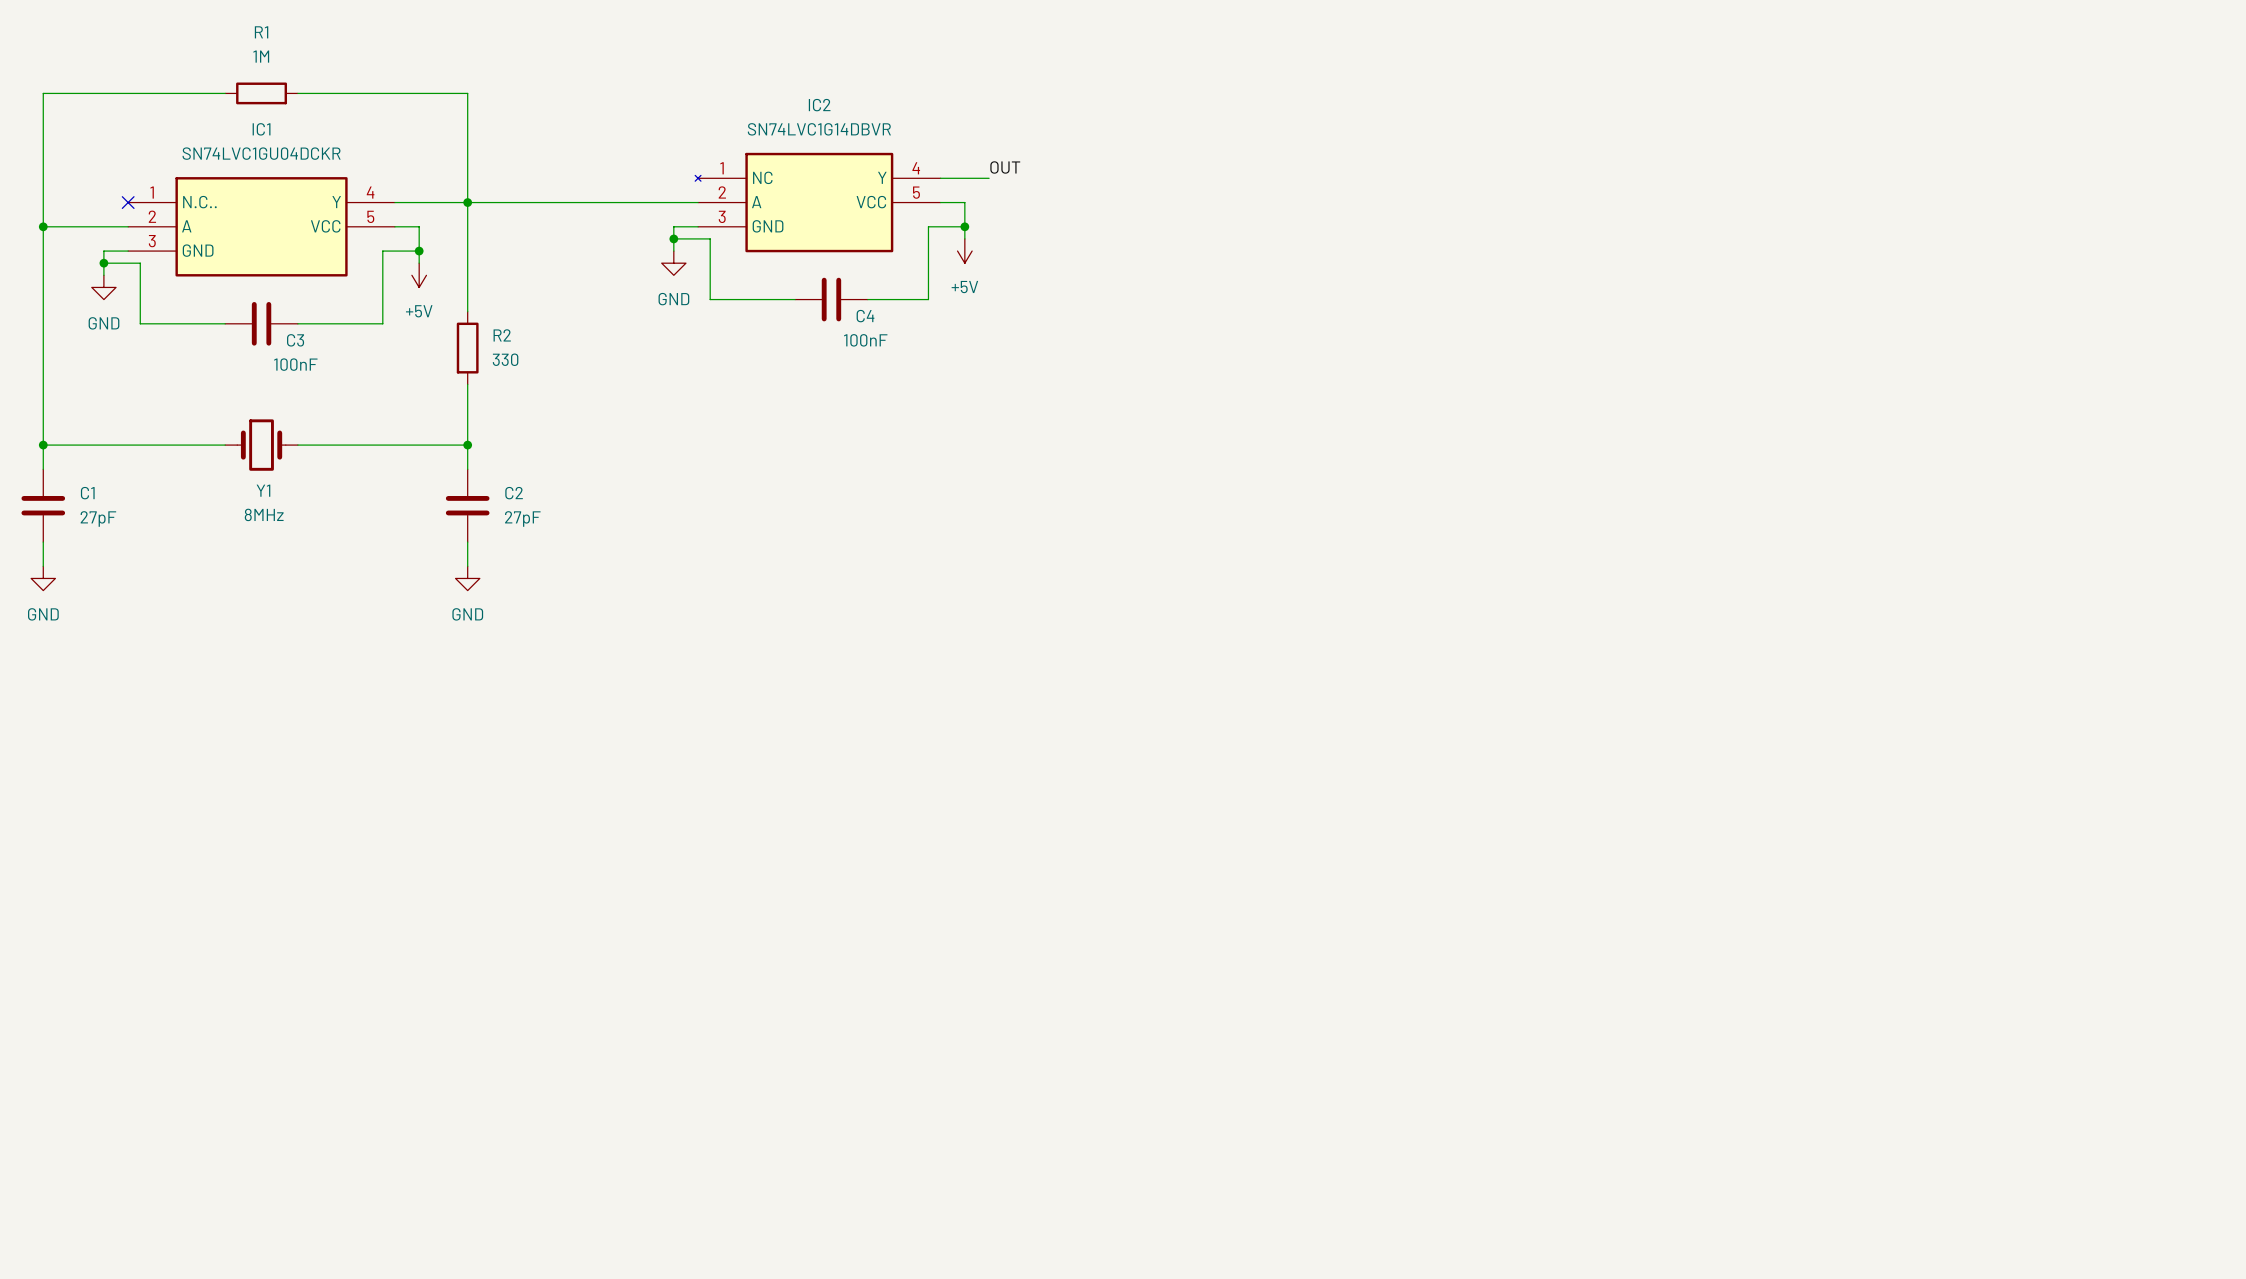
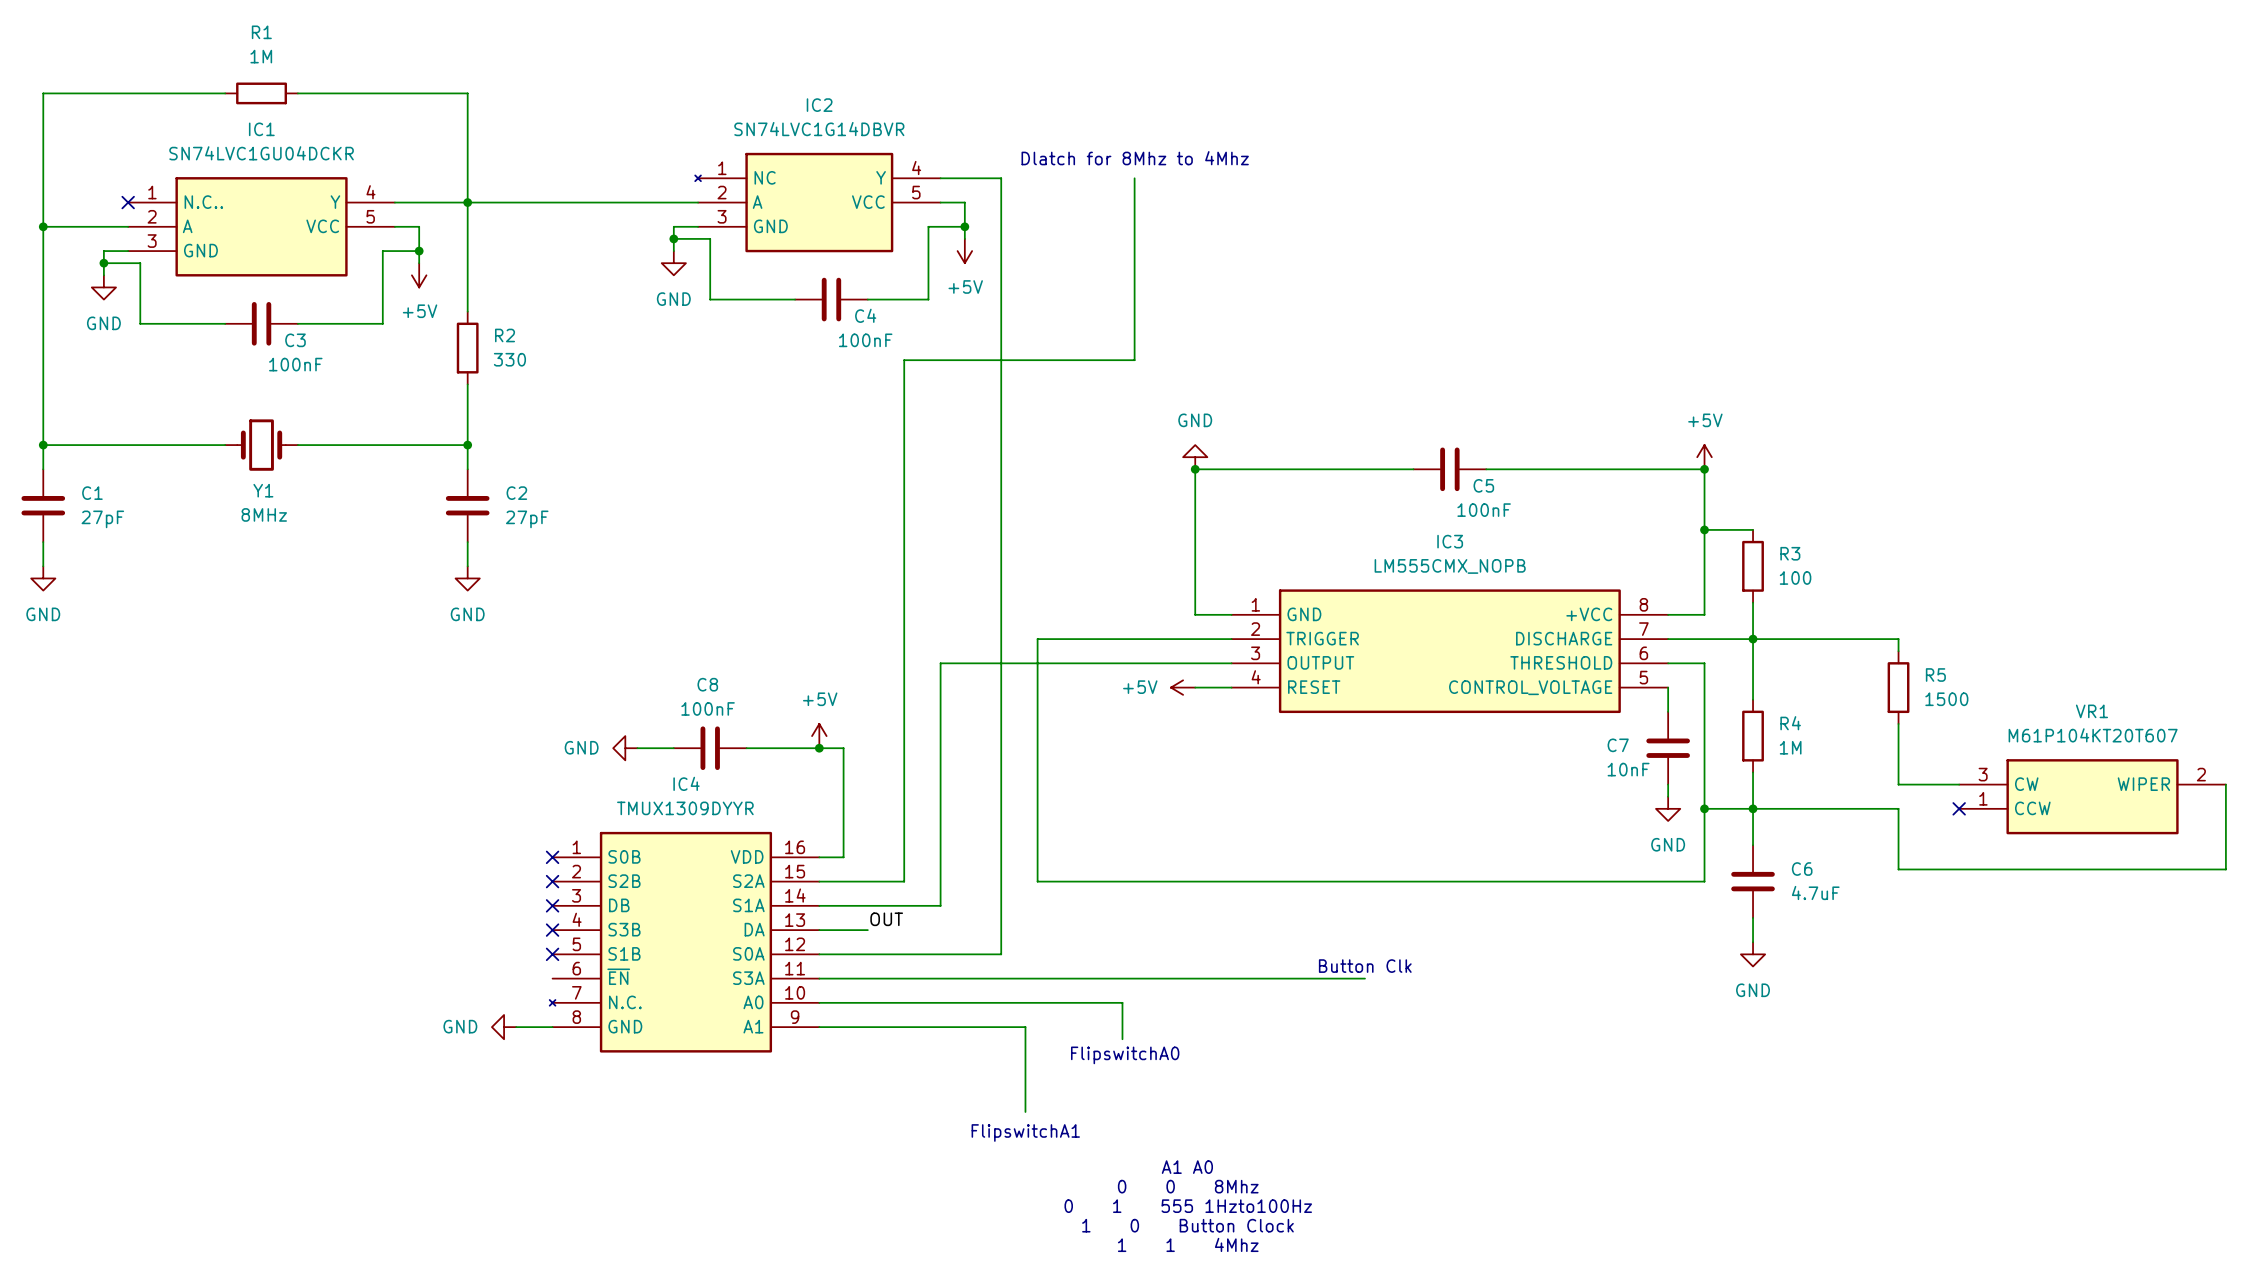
text: none -> Dlatch for 8Mhz to 4Mhz (1135, 158)
label: OUT (1005, 167) -> none
wire: none -> (989, 178) (1001, 178) (1001, 954) (819, 954)
wire: none -> (1134, 178) (1134, 360) (904, 360) (904, 881) (819, 881)
power symbol: none -> GND (1195, 457)
power symbol: none -> +5V (1704, 457)
junction: none -> (1195, 469)
wire: none -> (1413, 469) (1195, 469) (1195, 614) (1231, 614)
C5: none -> 100nF (1449, 469)
wire: none -> (1486, 469) (1704, 469) (1704, 614) (1668, 614)
junction: none -> (1704, 469)
wire: none -> (1704, 529) (1753, 529)
junction: none -> (1704, 529)
R3: none -> 100 (1753, 566)
wire: none -> (1753, 602) (1753, 699)
wire: none -> (1231, 639) (1037, 639) (1037, 881) (1704, 881) (1704, 663) (1668, 663)
wire: none -> (1668, 639) (1898, 639) (1898, 651)
junction: none -> (1753, 639)
IC3: none -> LM555CMX_NOPB (1449, 651)
wire: none -> (1231, 663) (940, 663) (940, 905) (819, 905)
power symbol: none -> +5V (1183, 687)
wire: none -> (1195, 687) (1231, 687)
wire: none -> (1668, 687) (1668, 711)
R5: none -> 1500 (1898, 687)
wire: none -> (1898, 723) (1898, 784) (1959, 784)
power symbol: none -> +5V (819, 736)
R4: none -> 1M (1753, 736)
power symbol: none -> GND (625, 748)
wire: none -> (637, 748) (673, 748)
C8: none -> 100nF (710, 748)
wire: none -> (746, 748) (843, 748) (843, 857) (819, 857)
junction: none -> (819, 748)
C7: none -> 10nF (1668, 748)
wire: none -> (1753, 772) (1753, 845)
wire: none -> (1668, 784) (1668, 796)
wire: none -> (2225, 784) (2225, 869) (1898, 869) (1898, 808) (1704, 808)
VR1: none -> M61P104KT20T607 (2092, 796)
power symbol: none -> GND (1668, 808)
junction: none -> (1704, 808)
junction: none -> (1753, 808)
no-connect mark: none -> (1959, 808)
no-connect mark: none -> (552, 857)
no-connect mark: none -> (552, 881)
C6: none -> 4.7uF (1753, 881)
no-connect mark: none -> (552, 905)
wire: none -> (1753, 917) (1753, 942)
label: none -> OUT (886, 919)
no-connect mark: none -> (552, 930)
wire: none -> (819, 930) (867, 930)
IC4: none -> TMUX1309DYYR (684, 942)
no-connect mark: none -> (552, 954)
power symbol: none -> GND (1753, 954)
text: none -> Button Clk (1365, 966)
wire: none -> (819, 978) (1364, 978)
wire: none -> (819, 1002) (1122, 1002) (1122, 1039)
power symbol: none -> GND (504, 1027)
wire: none -> (516, 1027) (552, 1027)
wire: none -> (819, 1027) (1025, 1027) (1025, 1111)
text: none -> FlipswitchA0 (1125, 1055)
text: none -> FlipswitchA1 (1025, 1133)
text: none -> A1 A0 (1187, 1167)
text: none -> 0 0 8Mhz (1188, 1186)
text: none -> 0 1 555 1Hzto100Hz (1188, 1206)
text: none -> 1 0 Button Clock (1187, 1225)
text: none -> 1 1 4Mhz (1188, 1244)

